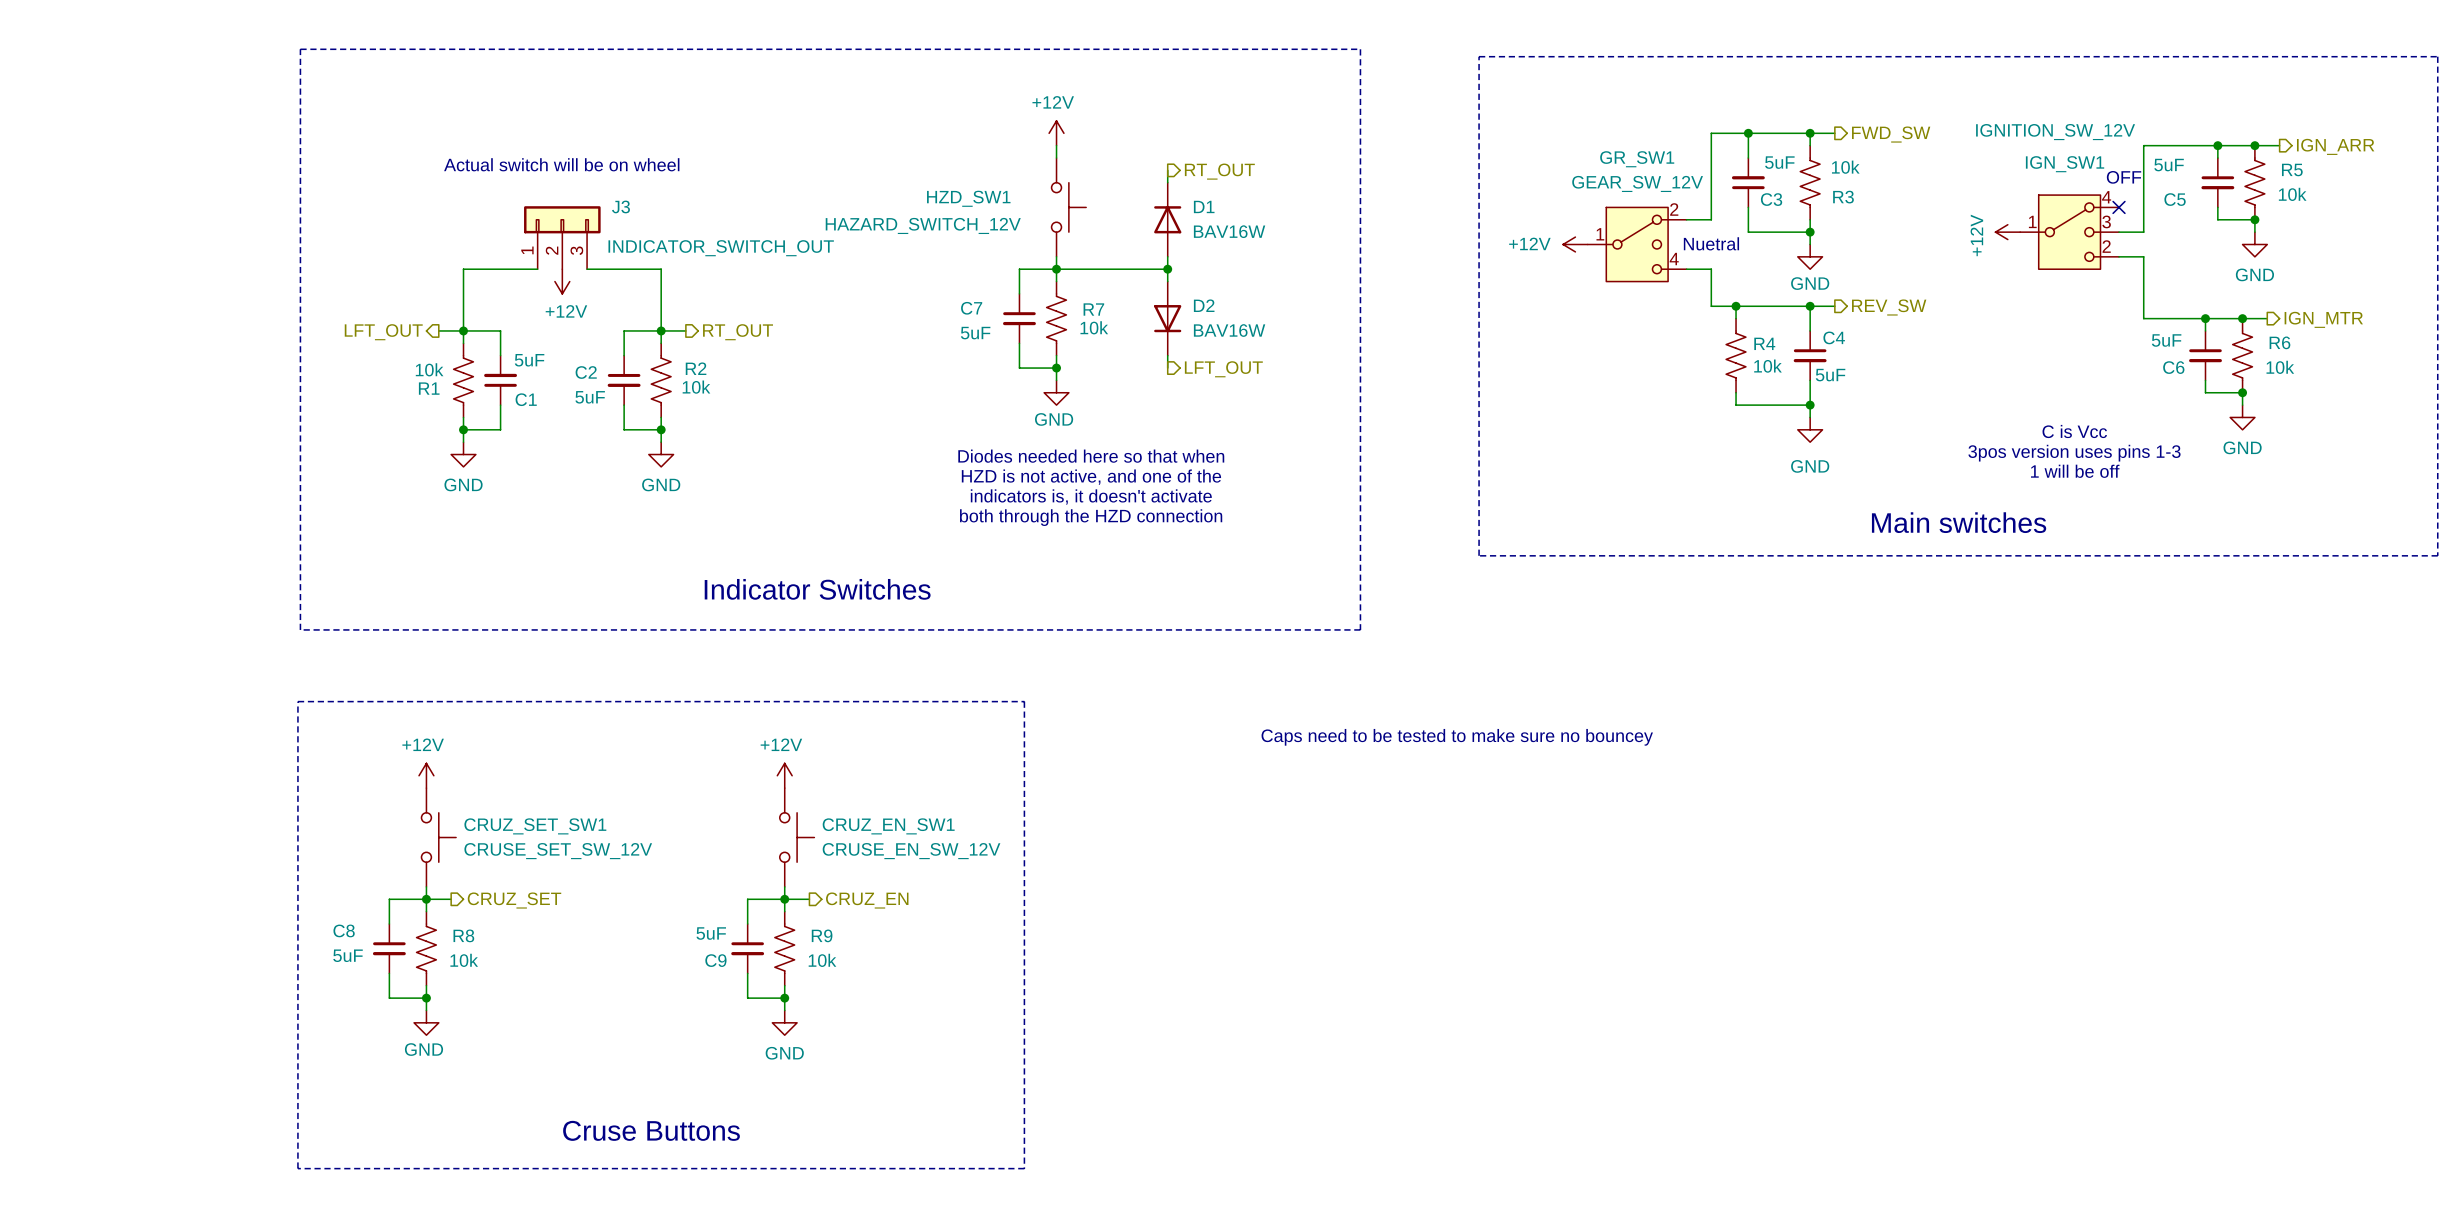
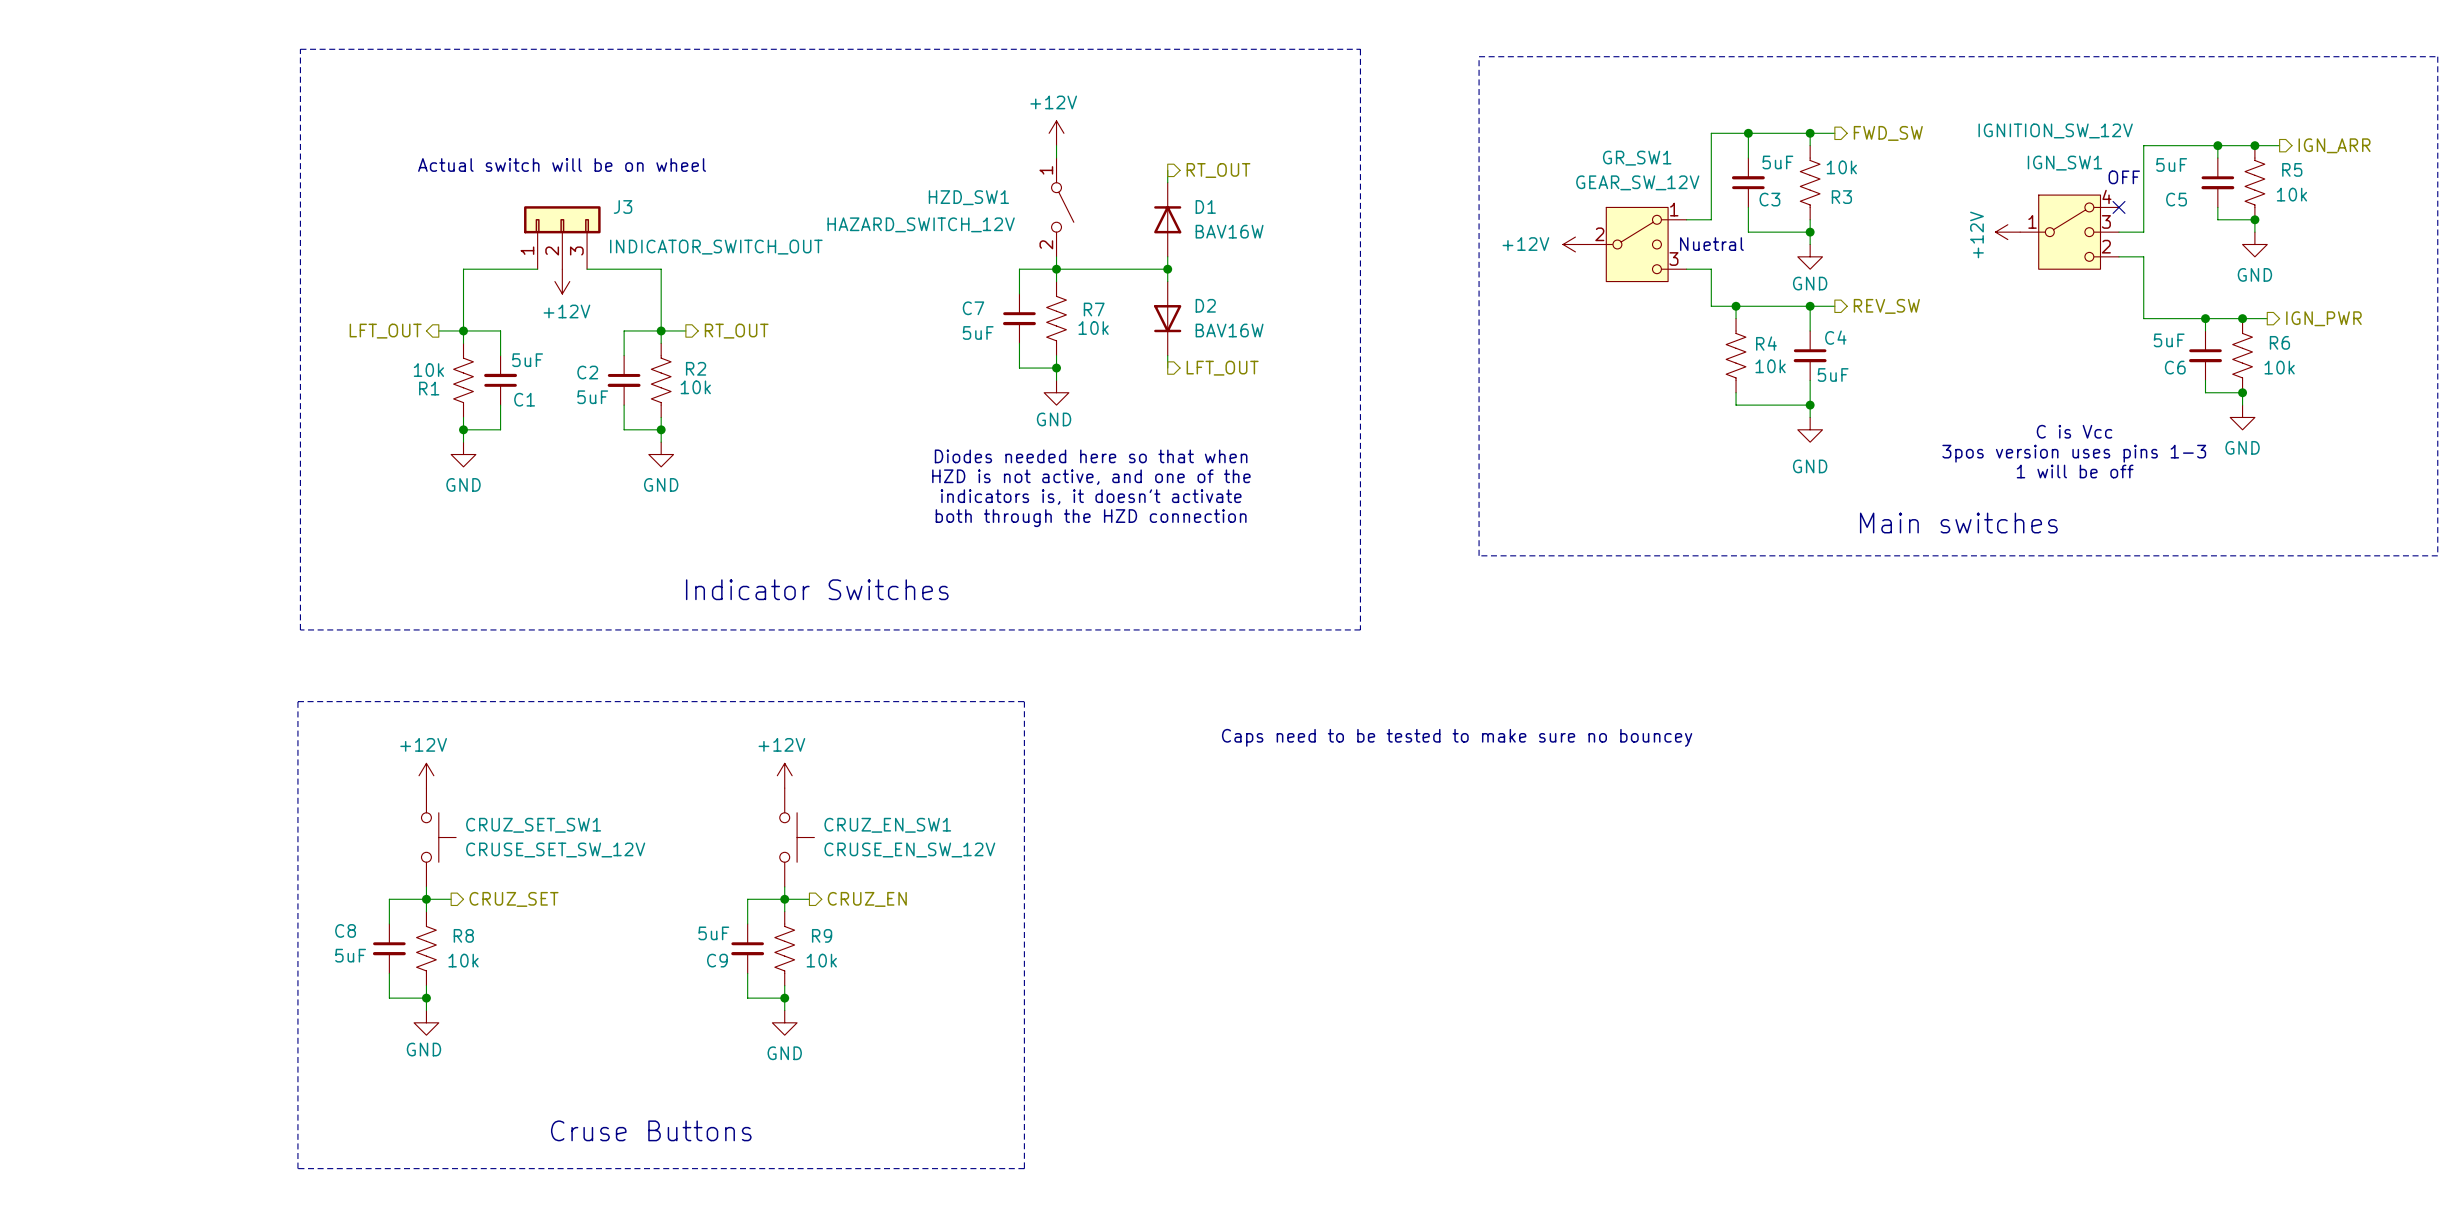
HZD_SW1 symbol: [1051, 158, 1087, 257] -> [1051, 158, 1074, 257]
GR_SW1 pin number: 2 (1674, 209) -> 1 (1674, 209)
GR_SW1 pin number: 1 (1600, 234) -> 2 (1599, 234)
GR_SW1 pin number: 4 (1674, 259) -> 3 (1673, 259)
hierarchical label: IGN_MTR (2323, 319) -> IGN_PWR (2323, 318)

